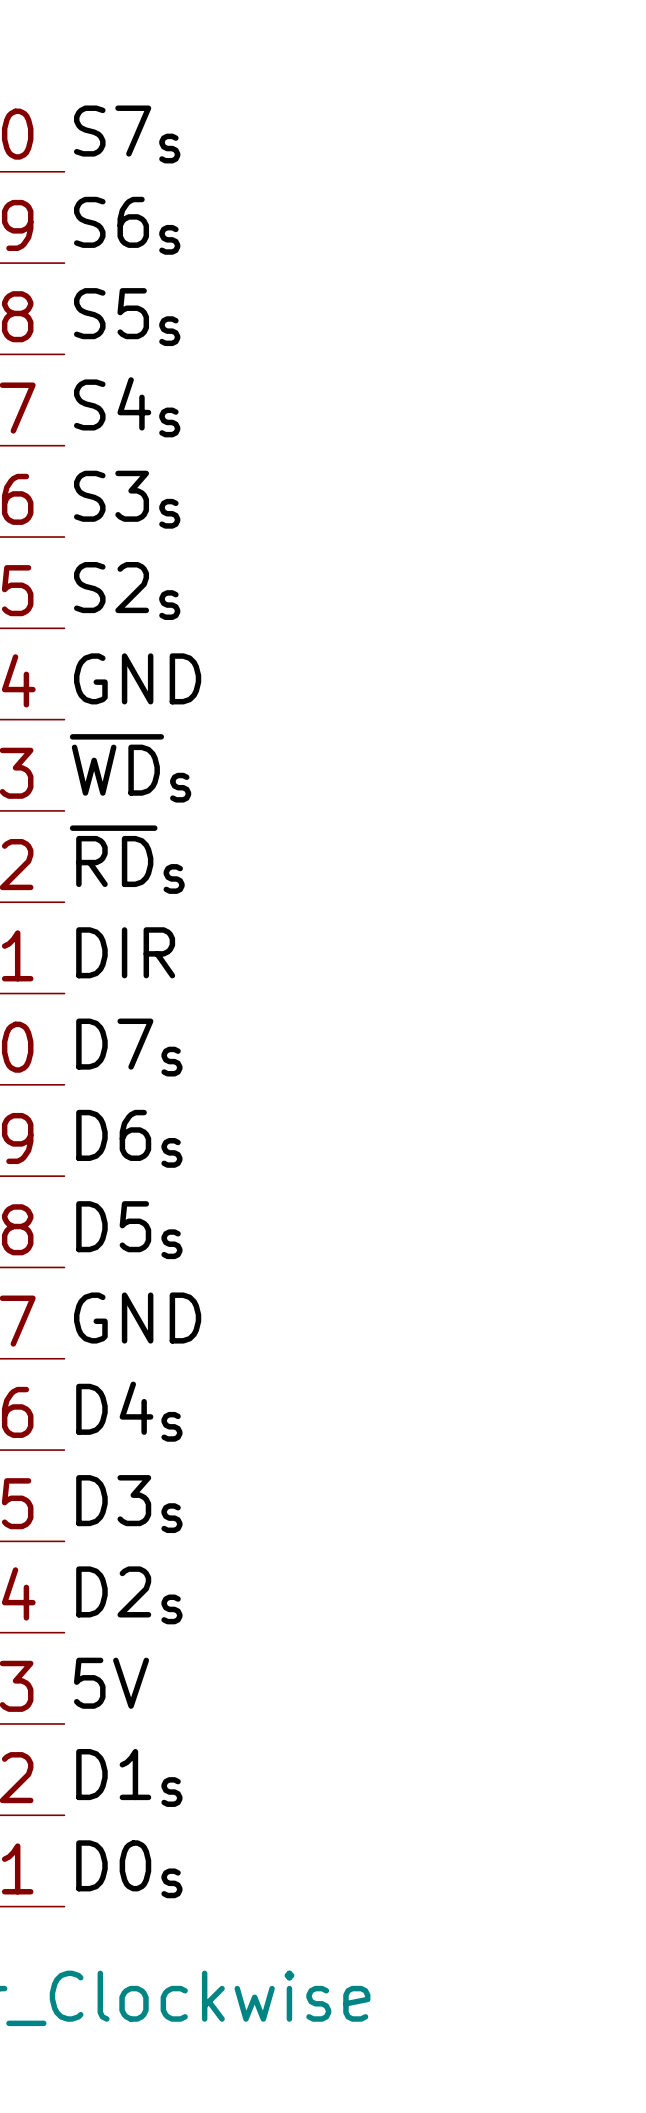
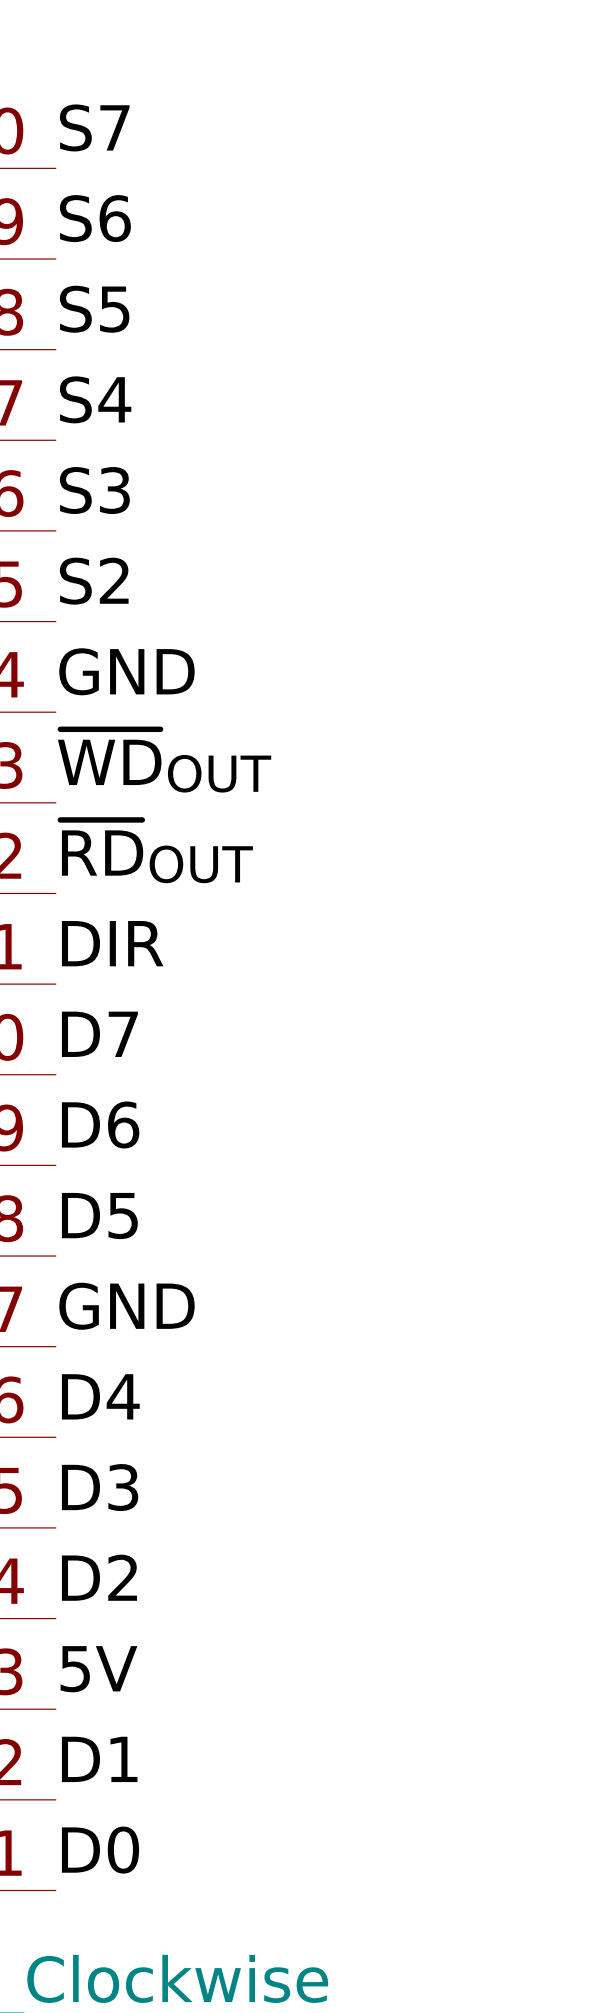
label: S7s (127, 134) -> S7 (94, 127)
label: S6s (127, 225) -> S6 (95, 218)
label: S5s (127, 317) -> S5 (94, 309)
label: S4s (127, 407) -> S4 (95, 399)
label: S3s (127, 499) -> S3 (94, 490)
label: S2s (127, 590) -> S2 (94, 581)
label: ~{WD}s (130, 768) -> ~{WD}OUT (164, 760)
label: ~{RD}s (127, 859) -> ~{RD}OUT (156, 851)
label: D7s (129, 1047) -> D7 (99, 1034)
label: D6s (129, 1138) -> D6 (100, 1124)
label: D5s (129, 1230) -> D5 (99, 1216)
label: D4s (129, 1411) -> D4 (100, 1396)
label: D3s (129, 1504) -> D3 (100, 1487)
label: D2s (129, 1595) -> D2 (99, 1577)
label: D1s (129, 1777) -> D1 (99, 1759)
label: D0s (129, 1869) -> D0 (100, 1850)

